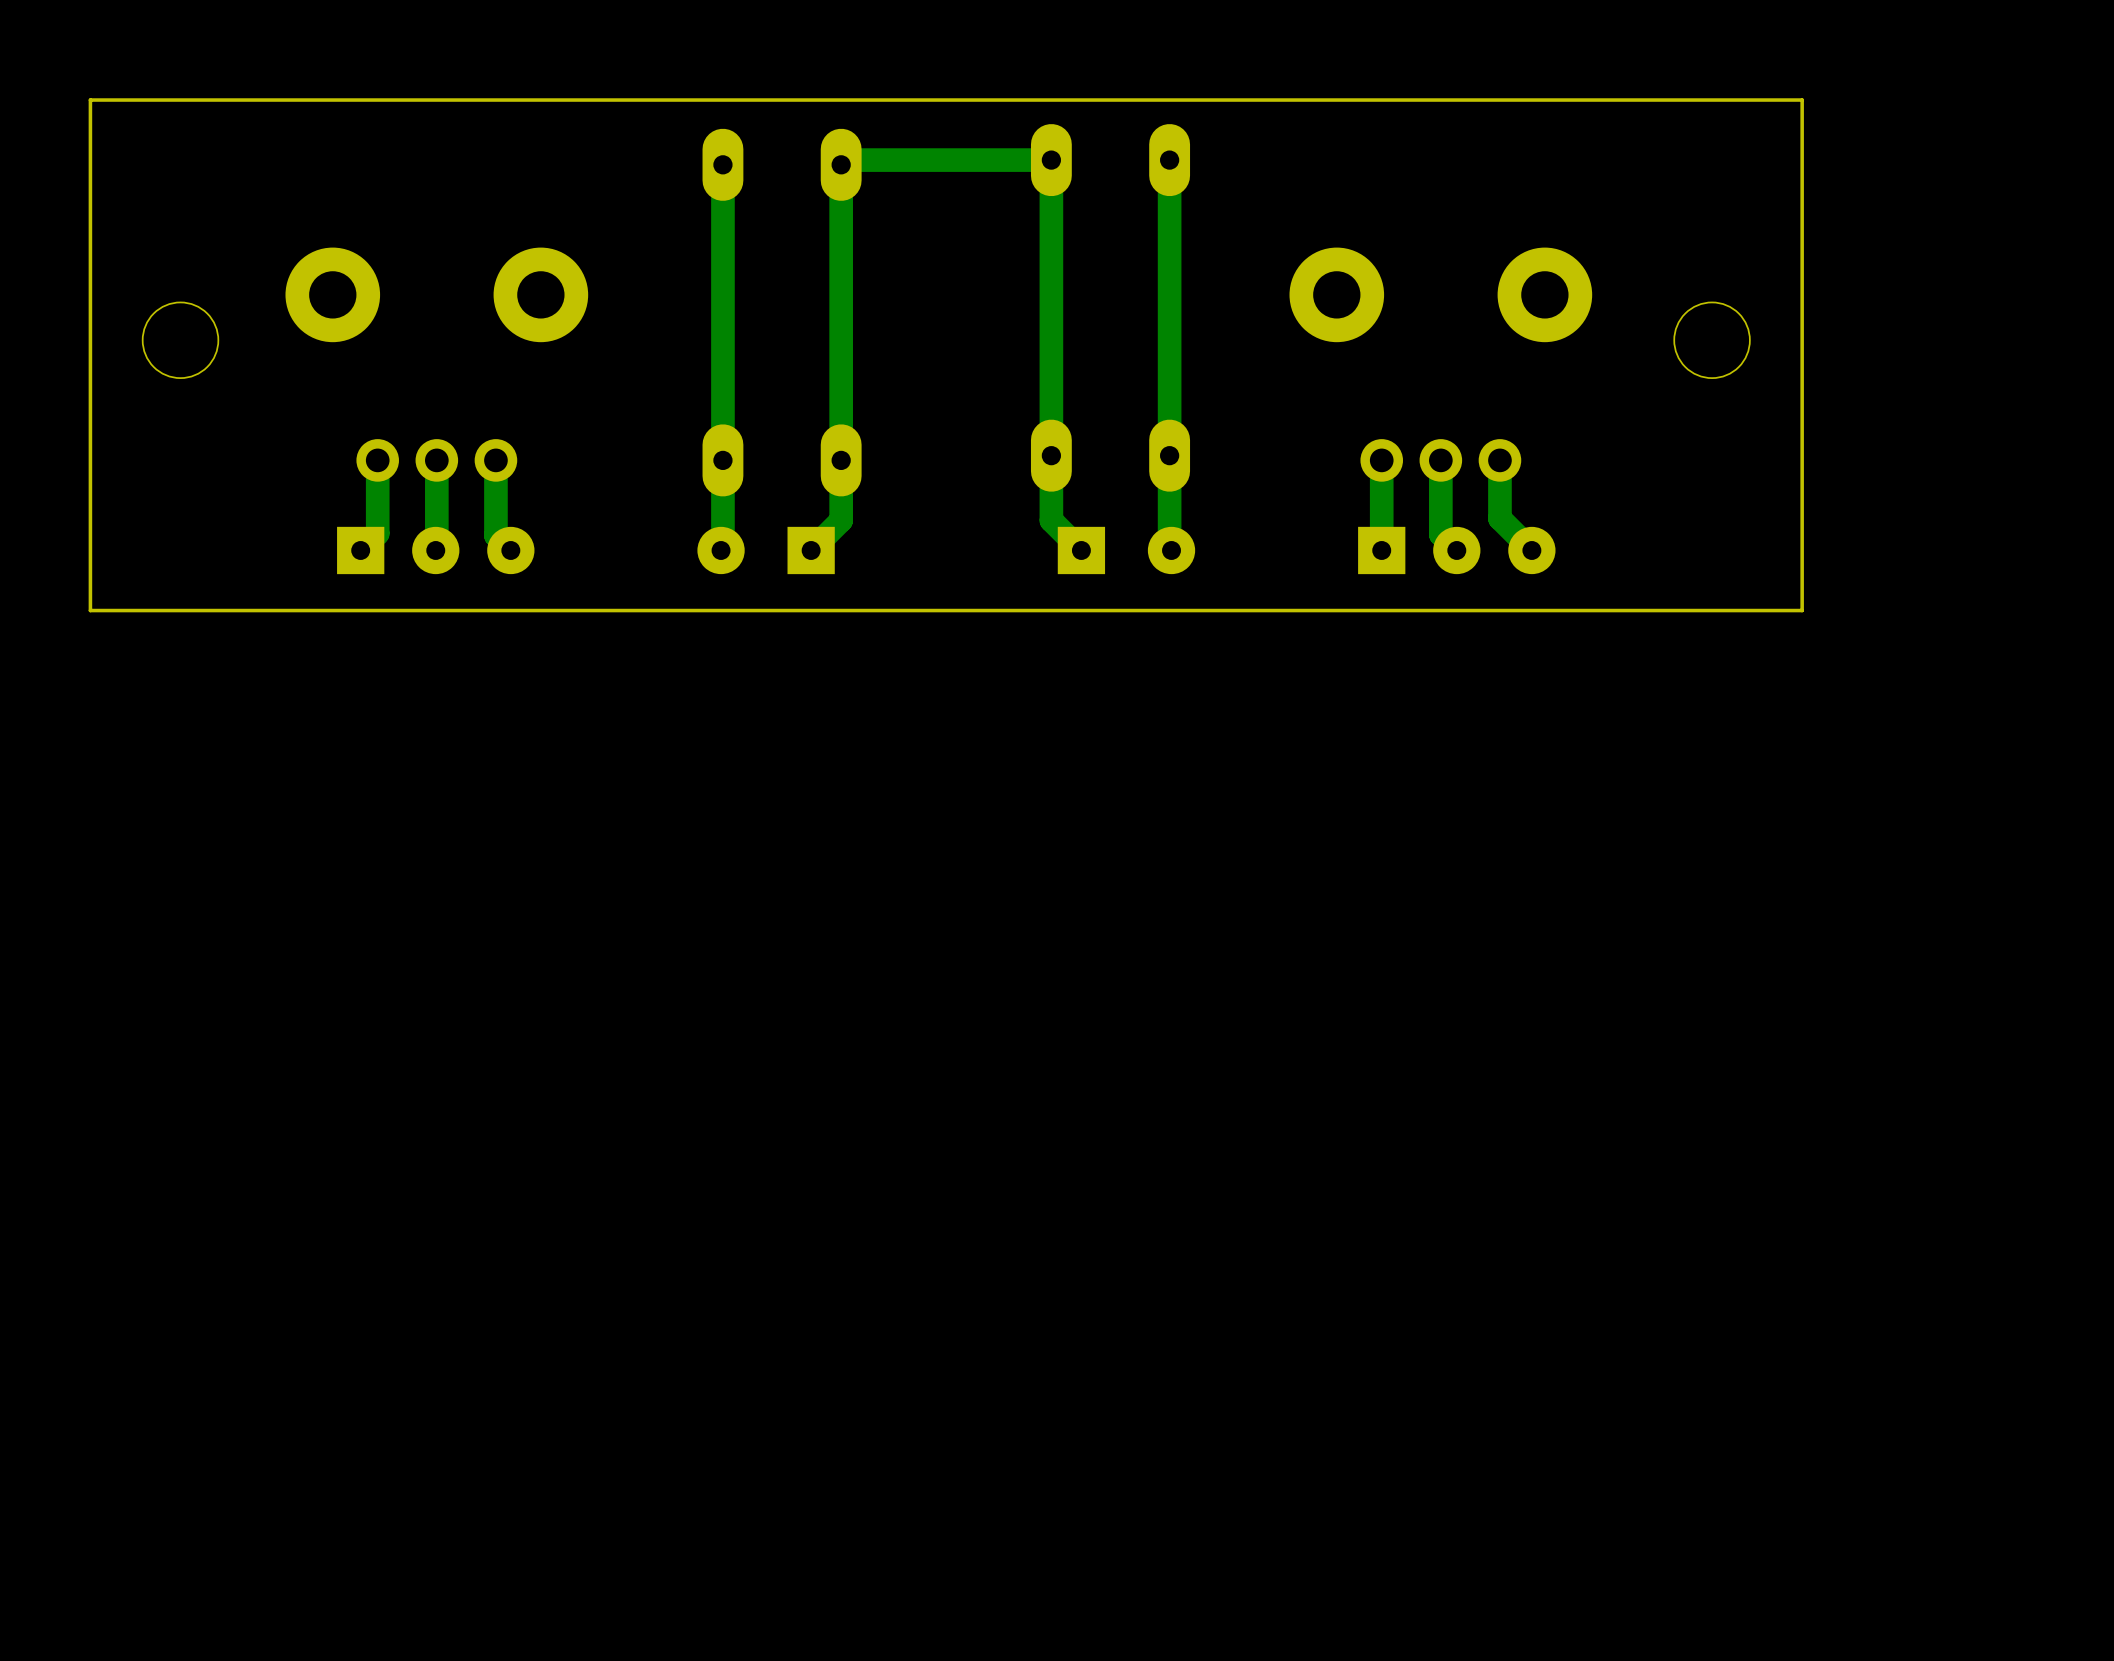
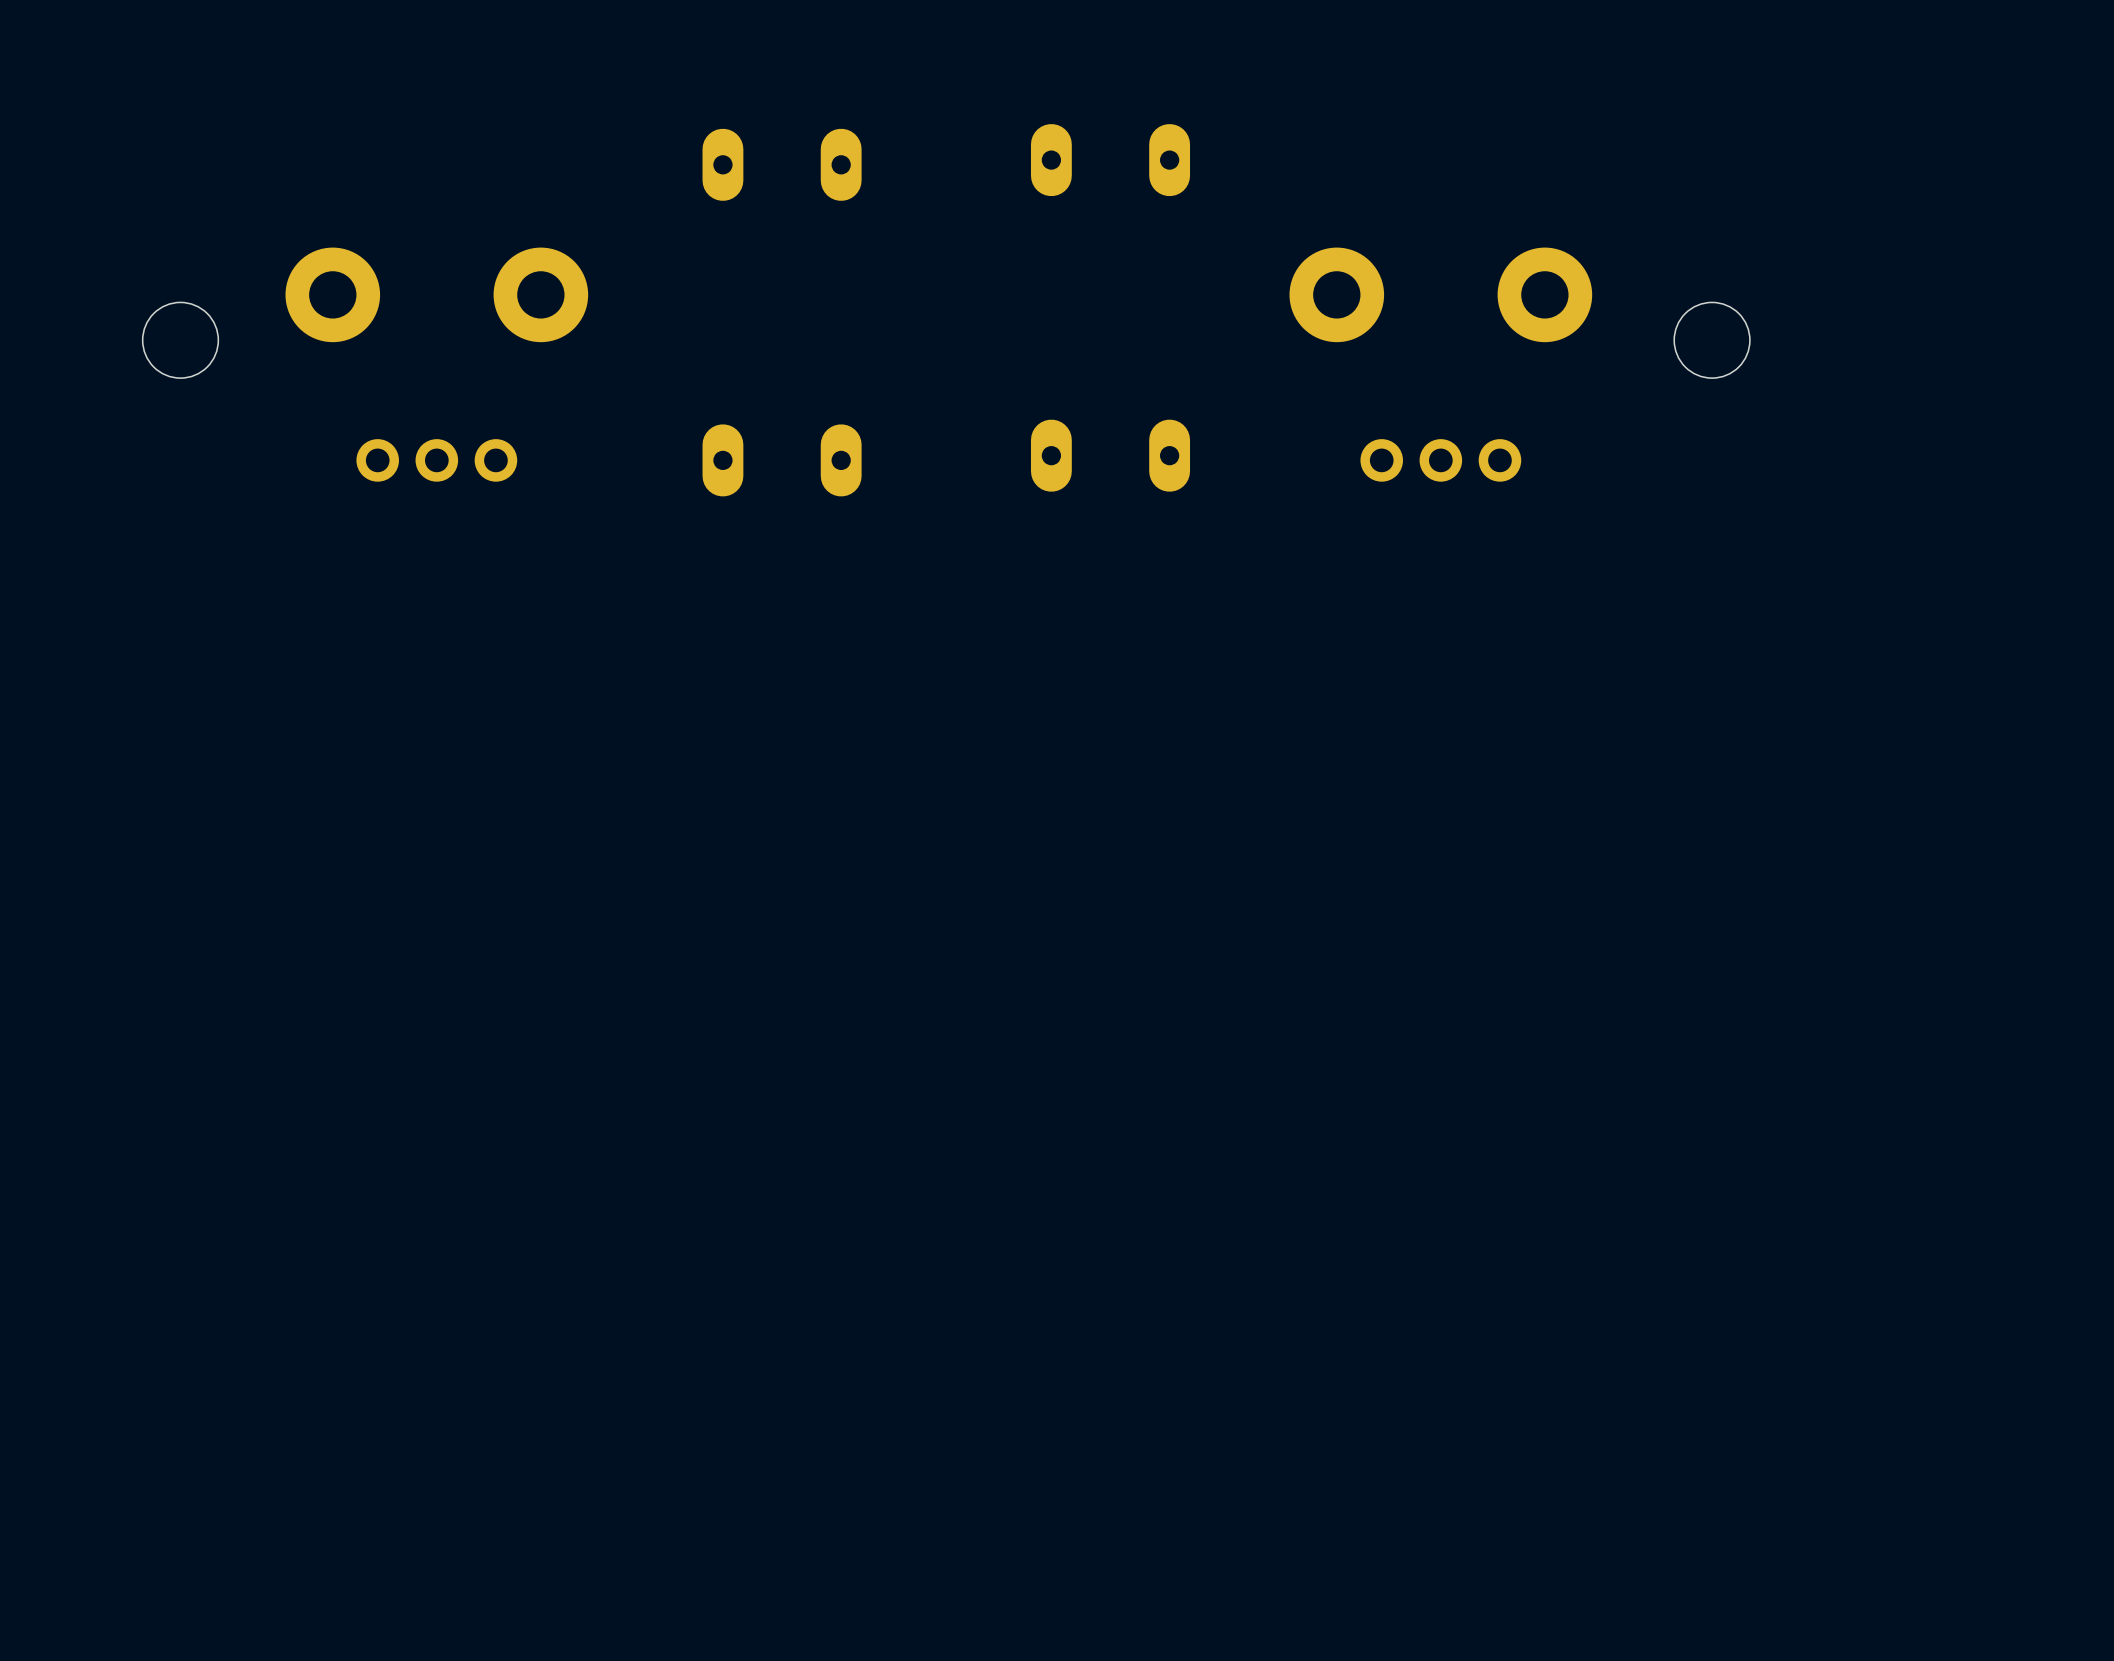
board edge: (1802, 100) (1802, 610) (90, 610) (90, 100) (1802, 100) -> none
track: (722, 149) (722, 548) (721, 550) -> none
track: (1169, 160) (1169, 548) (1171, 550) -> none
track: (377, 460) (377, 533) (360, 550) -> none
track: (436, 460) (435, 550) -> none
track: (495, 460) (495, 535) (510, 550) -> none
track: (1381, 460) (1381, 550) -> none
track: (1440, 460) (1440, 534) (1456, 550) -> none
track: (1499, 460) (1499, 518) (1531, 550) -> none
part: (435, 550) -> none
part: (766, 550) -> none
track: (1081, 550) (1051, 520) (1051, 160) (845, 160) (841, 164) (841, 520) (811, 550) -> none
part: (1126, 550) -> none
part: (1456, 550) -> none

